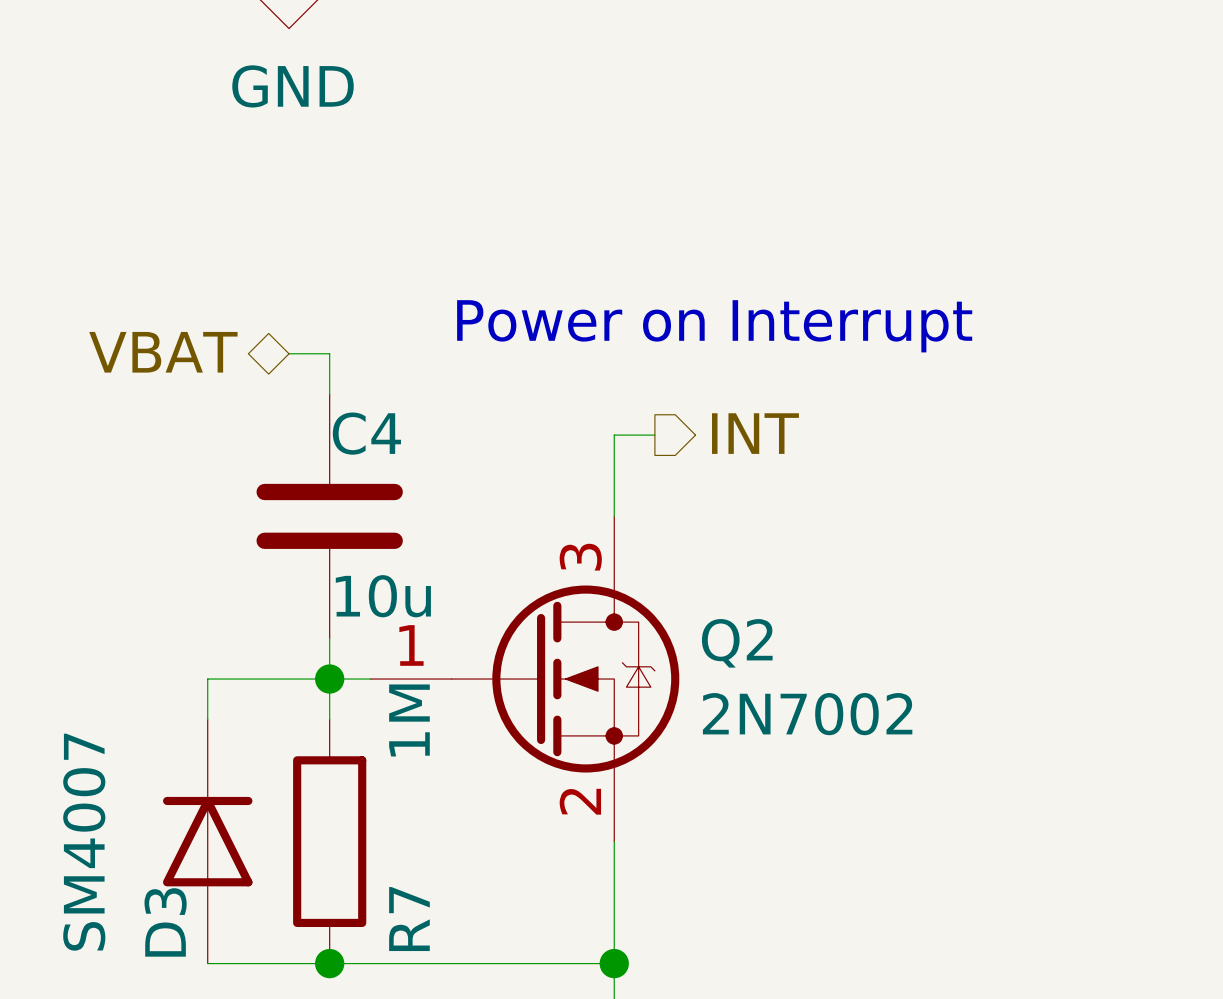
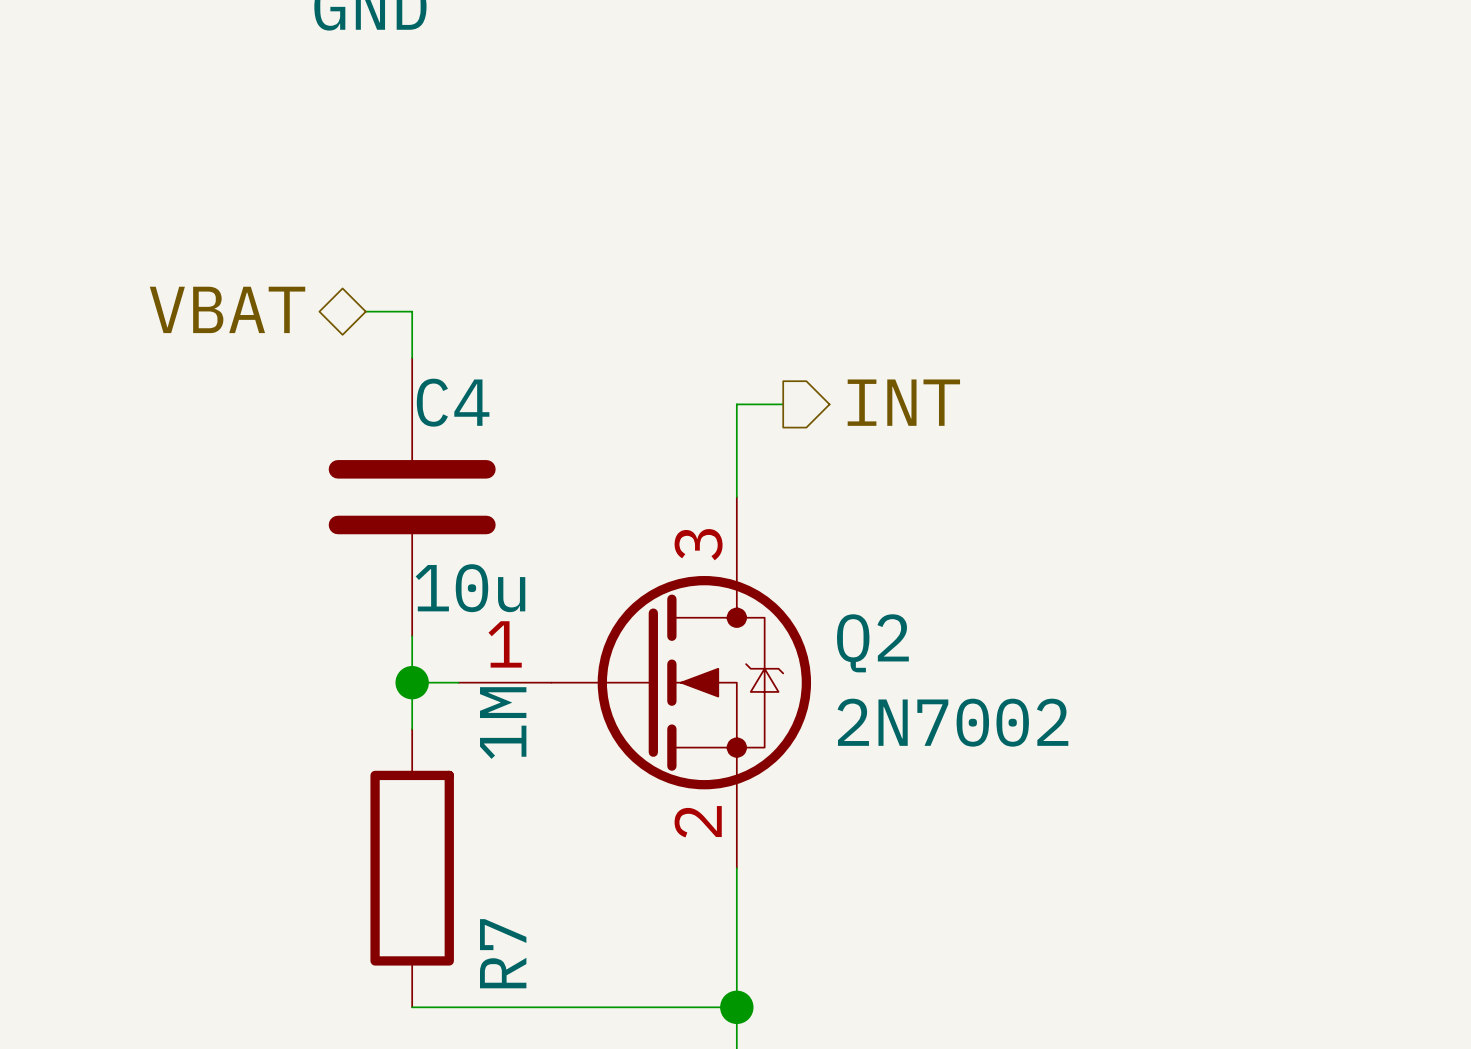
text: Power on Interrupt (714, 326) -> none
wire: (329, 679) (207, 679) (207, 719) -> none
D3: SM4007 (207, 841) -> none
wire: (207, 963) (329, 963) -> none
junction: (329, 963) -> none

